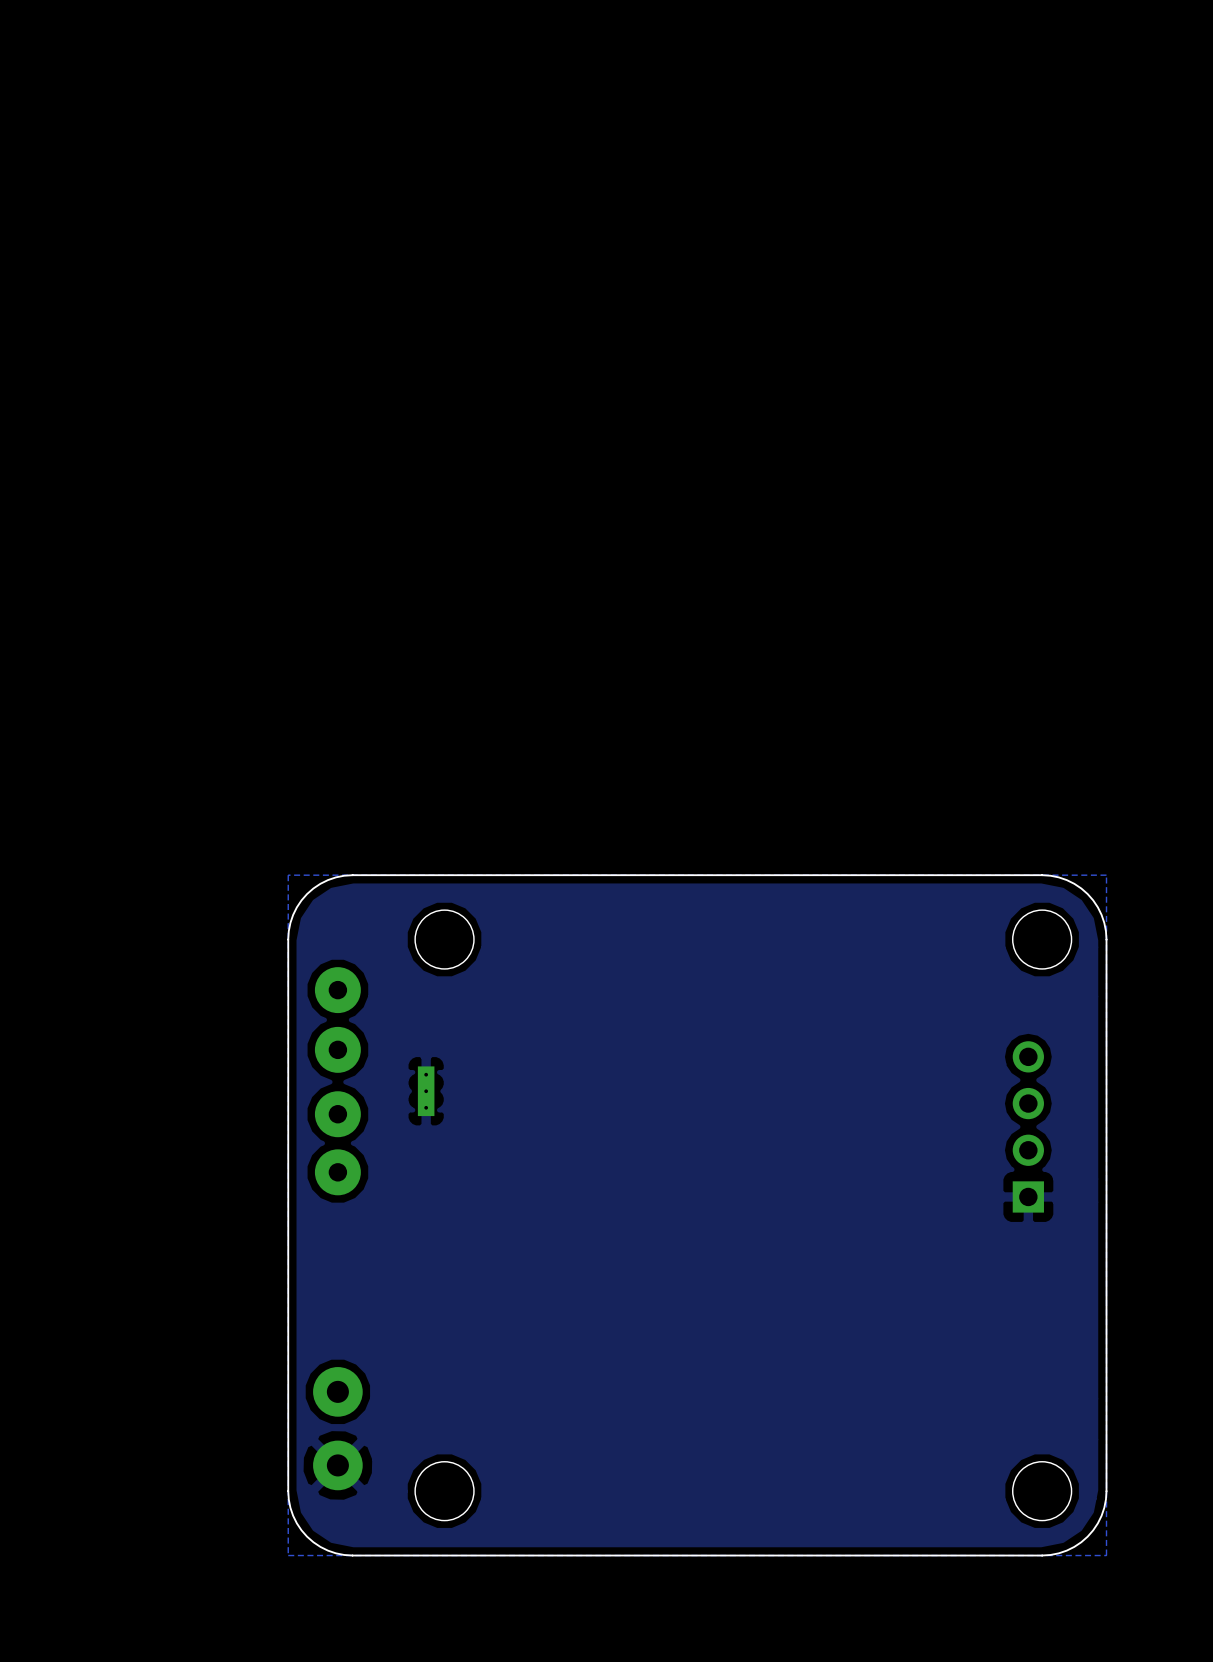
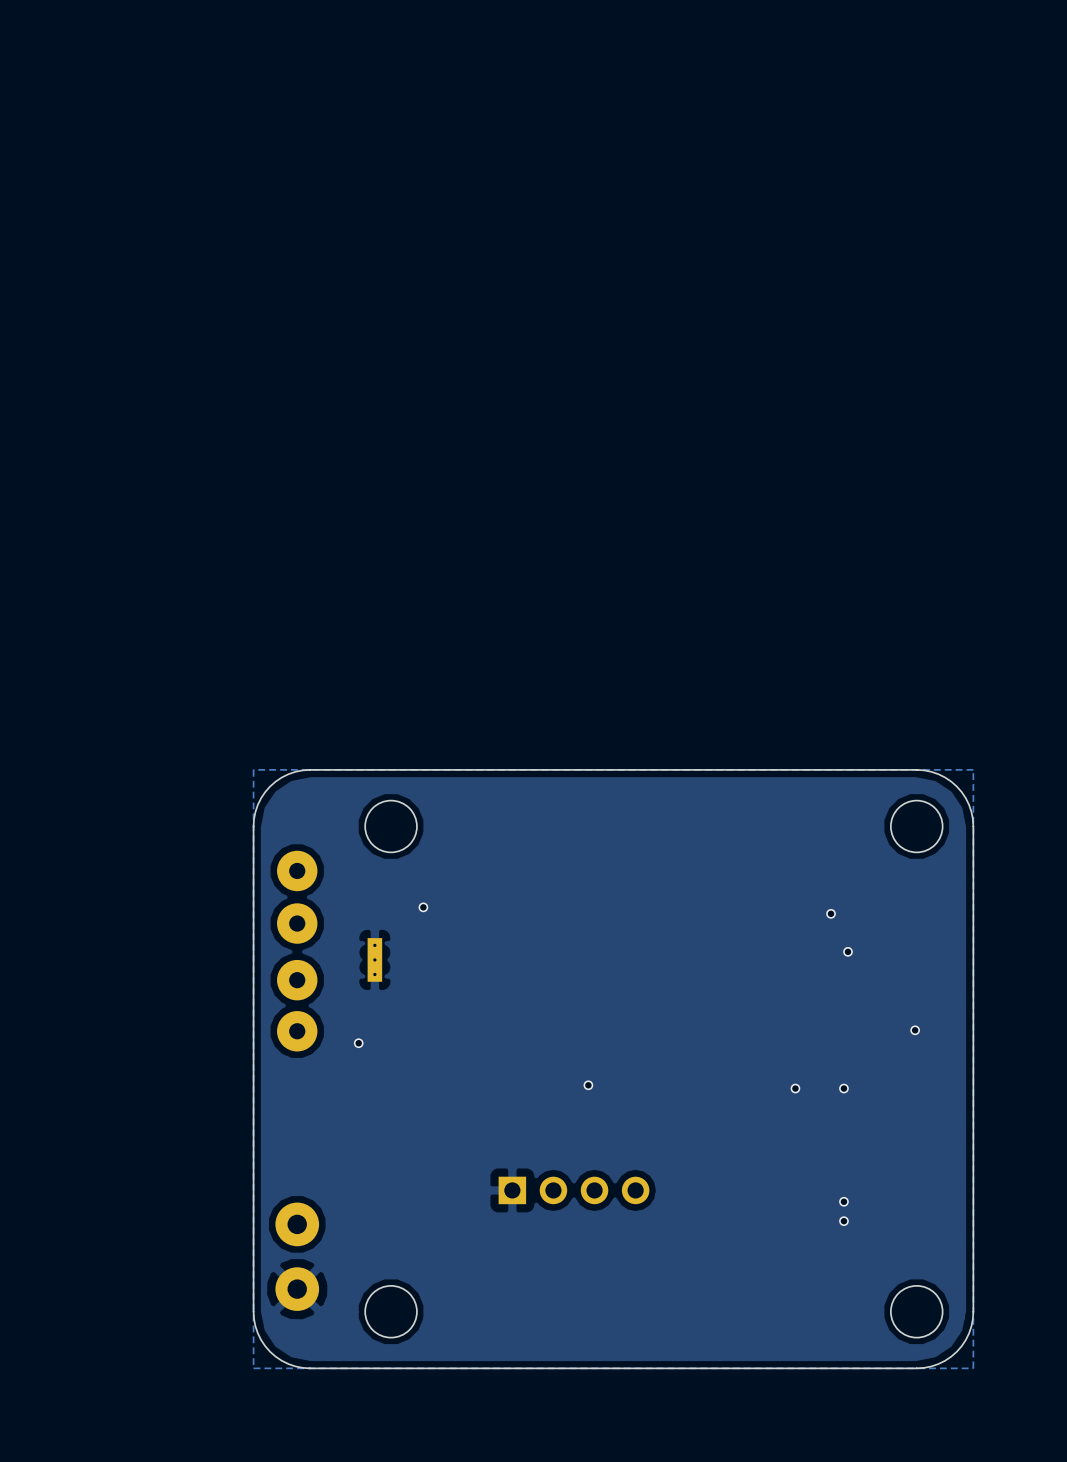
via: none -> (423, 907)
via: none -> (831, 913)
via: none -> (848, 951)
part rotation: 0° (1028, 1126) -> 90° clockwise (573, 1190)
part position: (1028, 1126) -> (573, 1190)
via: none -> (915, 1030)
via: none -> (358, 1043)
via: none -> (588, 1085)
via: none -> (795, 1088)
via: none -> (843, 1088)
via: none -> (843, 1201)
via: none -> (843, 1221)

